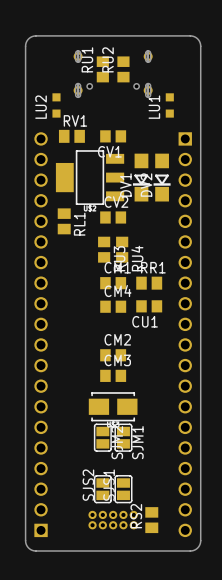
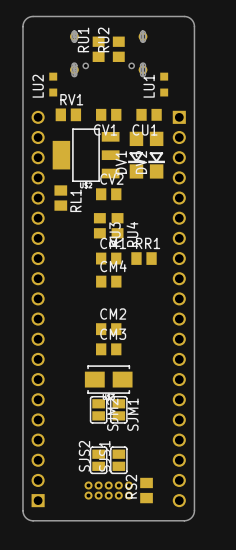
CU1 position: (149, 306) -> (149, 114)

